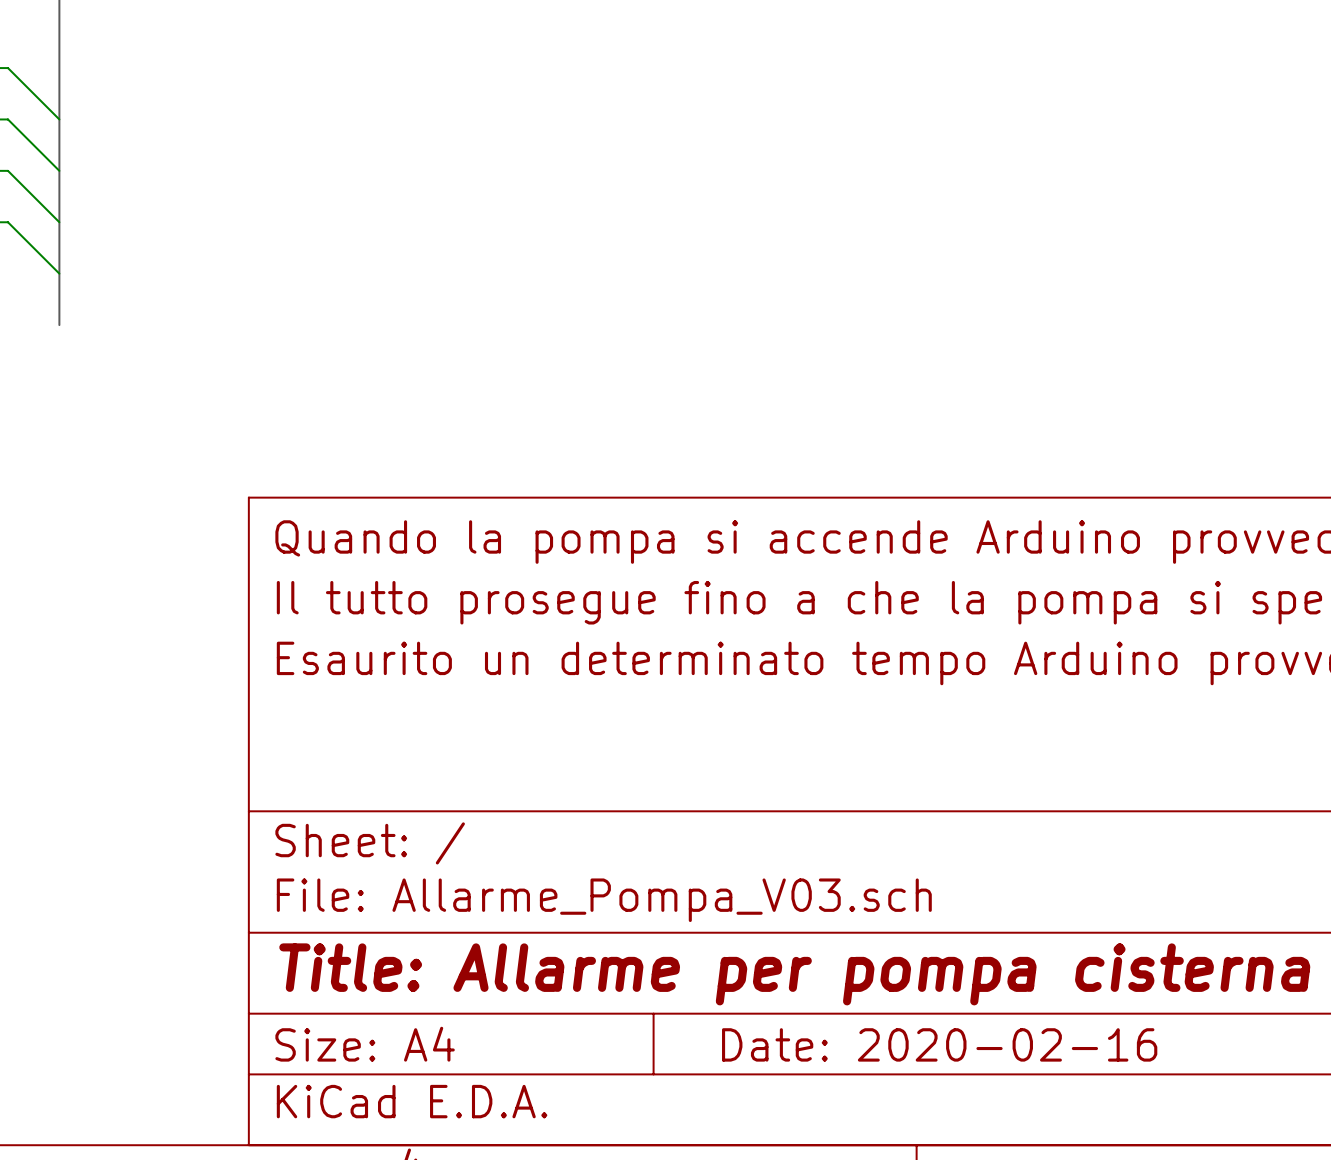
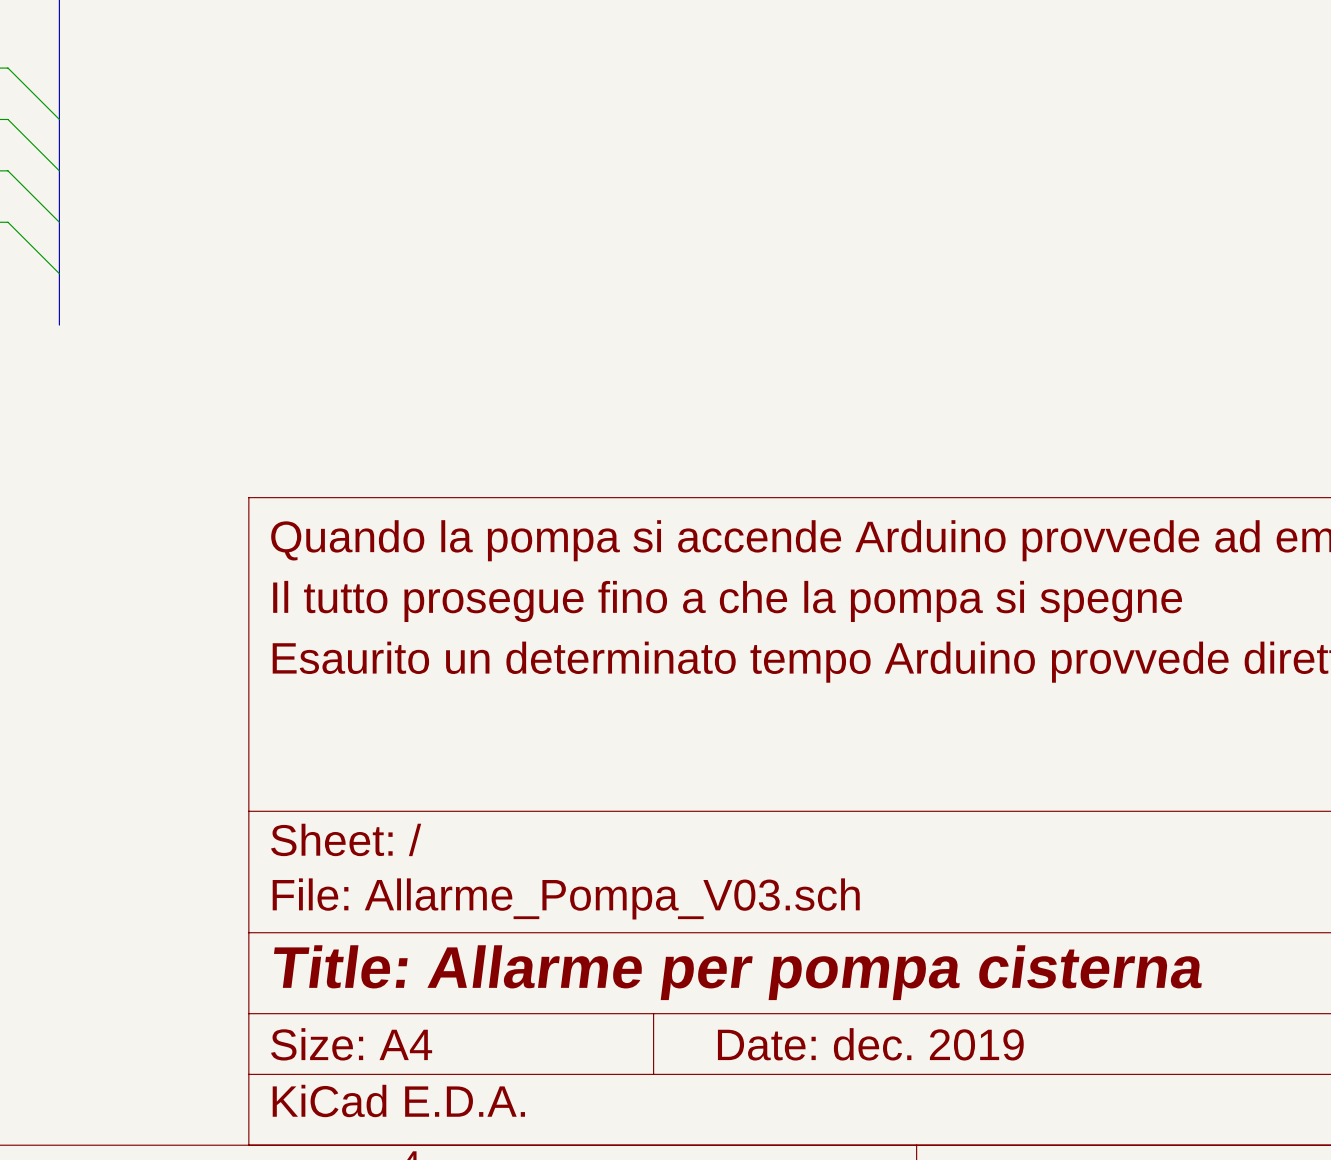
title block: Date: 2020-02-16 (939, 1044) -> Date: dec. 2019 (870, 1044)

